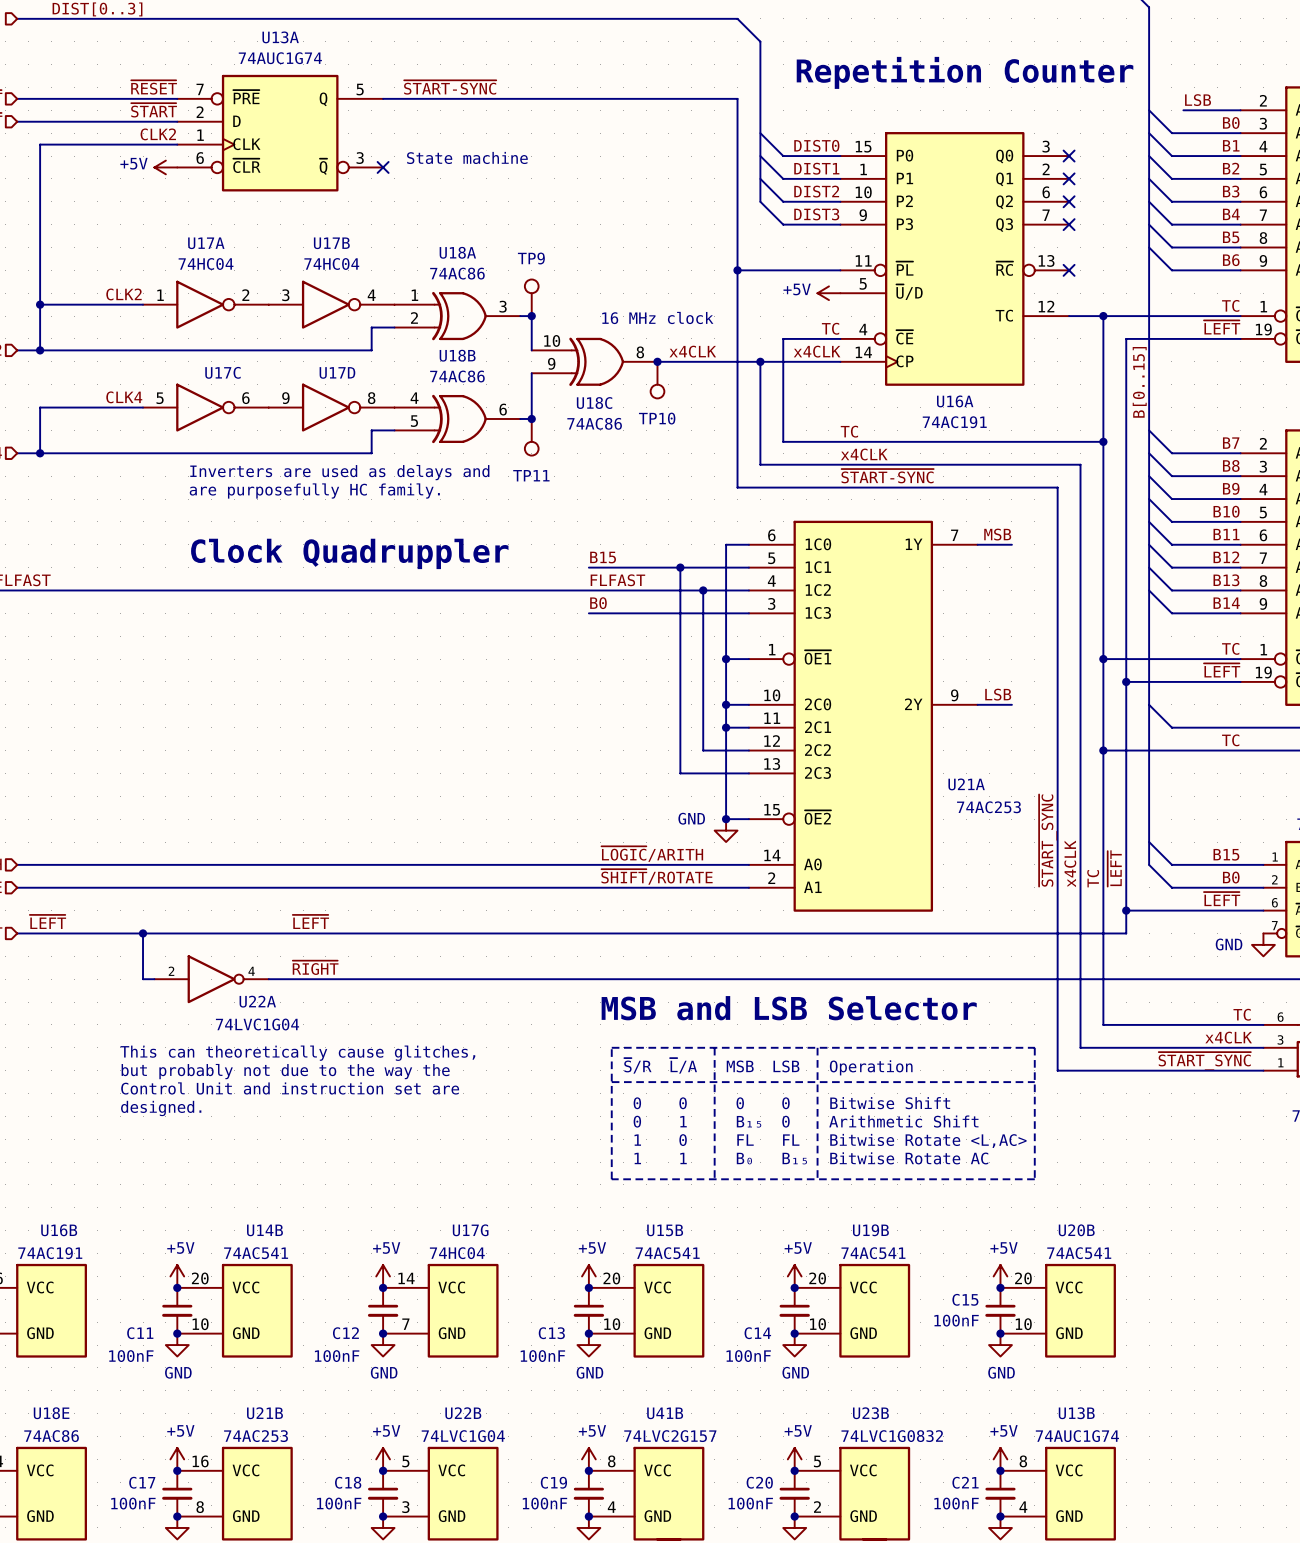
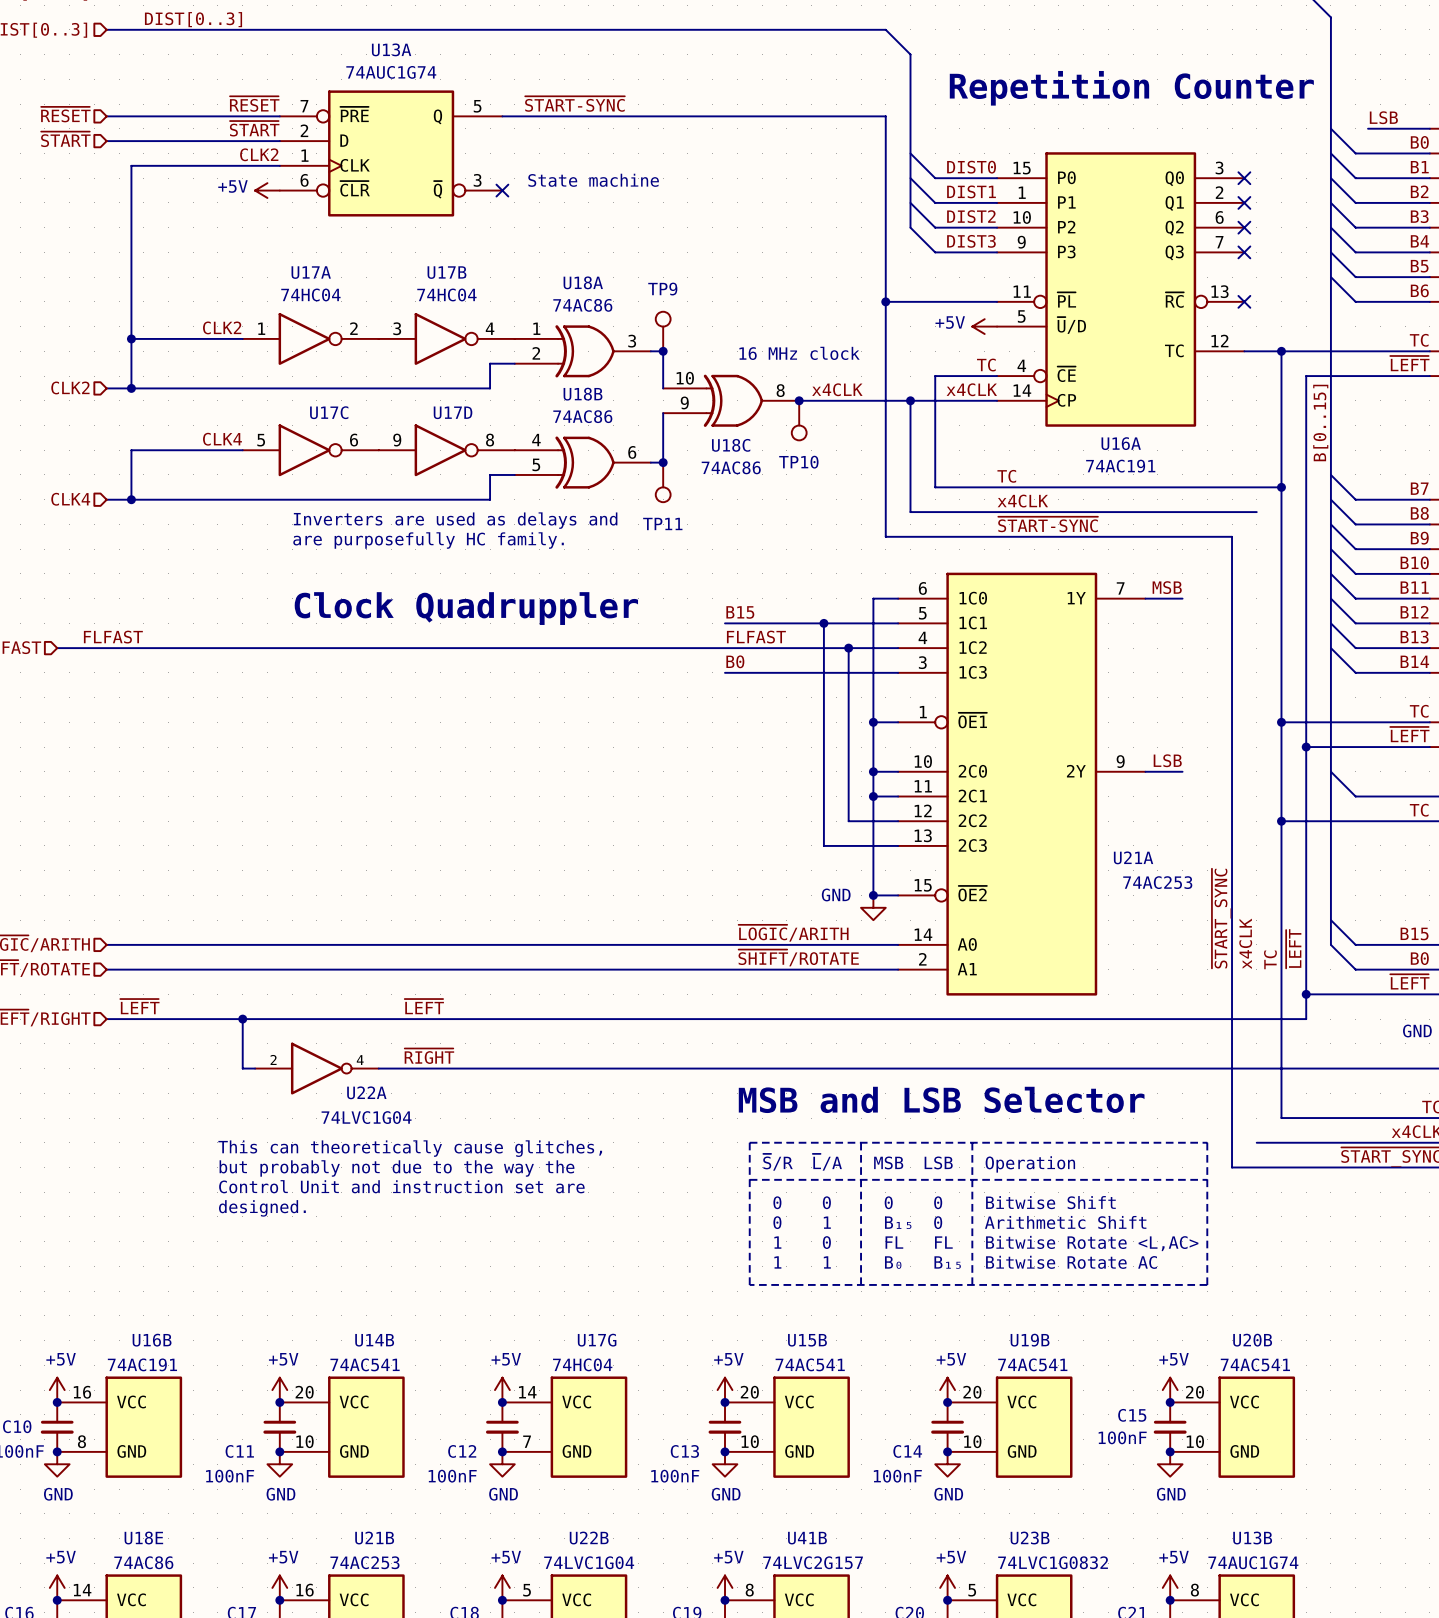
wire: (1080, 464) (1080, 1047) -> none

